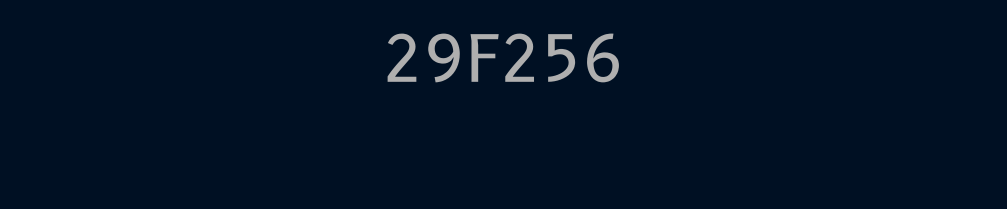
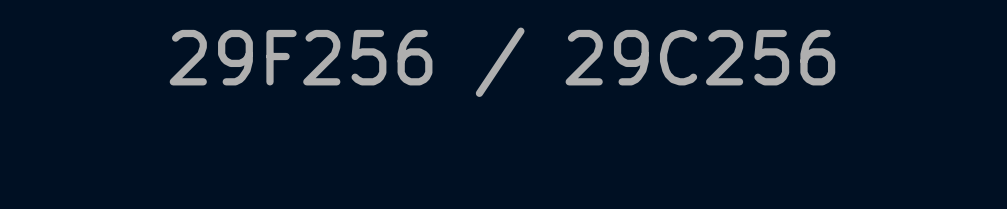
part value: 29F256 (503, 57) -> 29F256 / 29C256 (502, 62)

